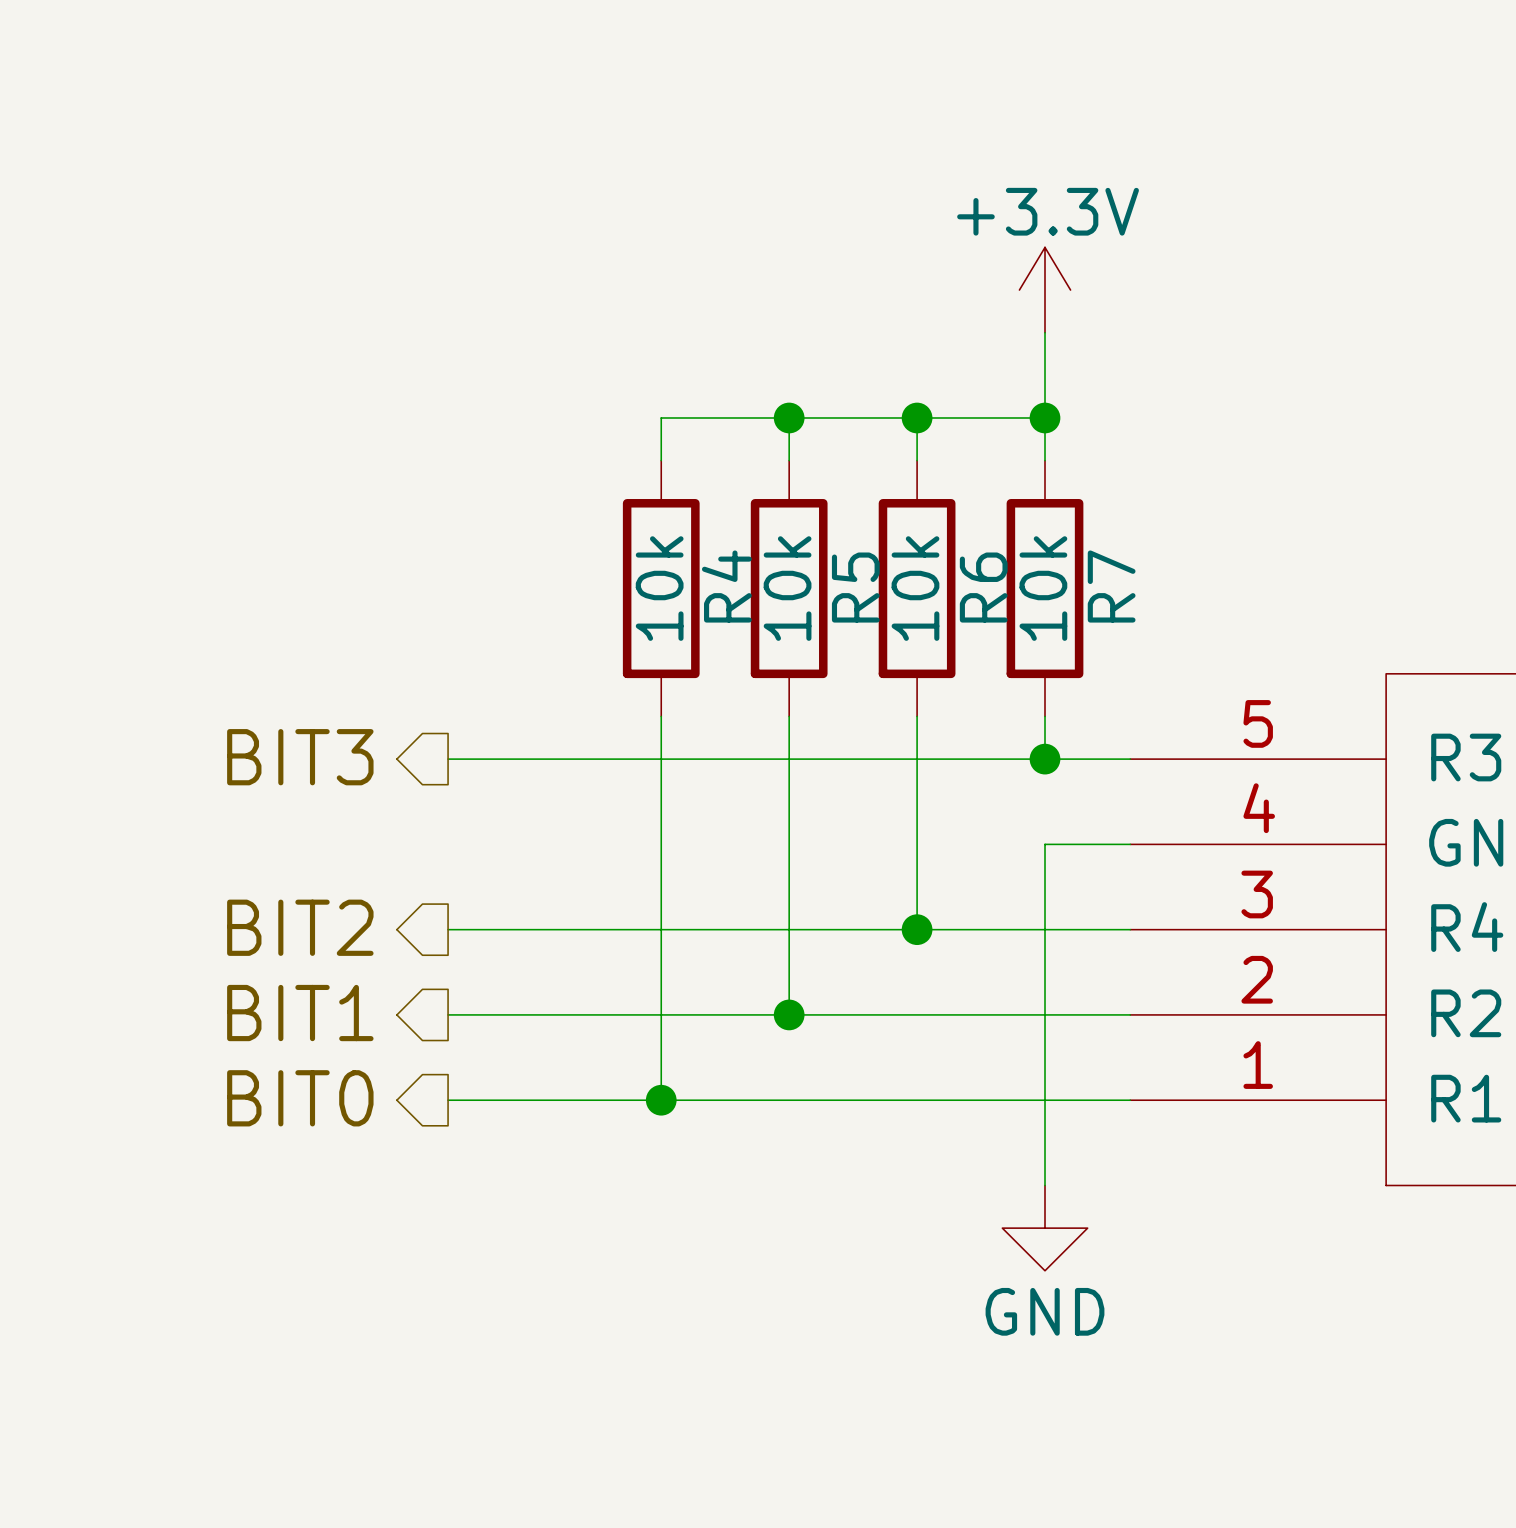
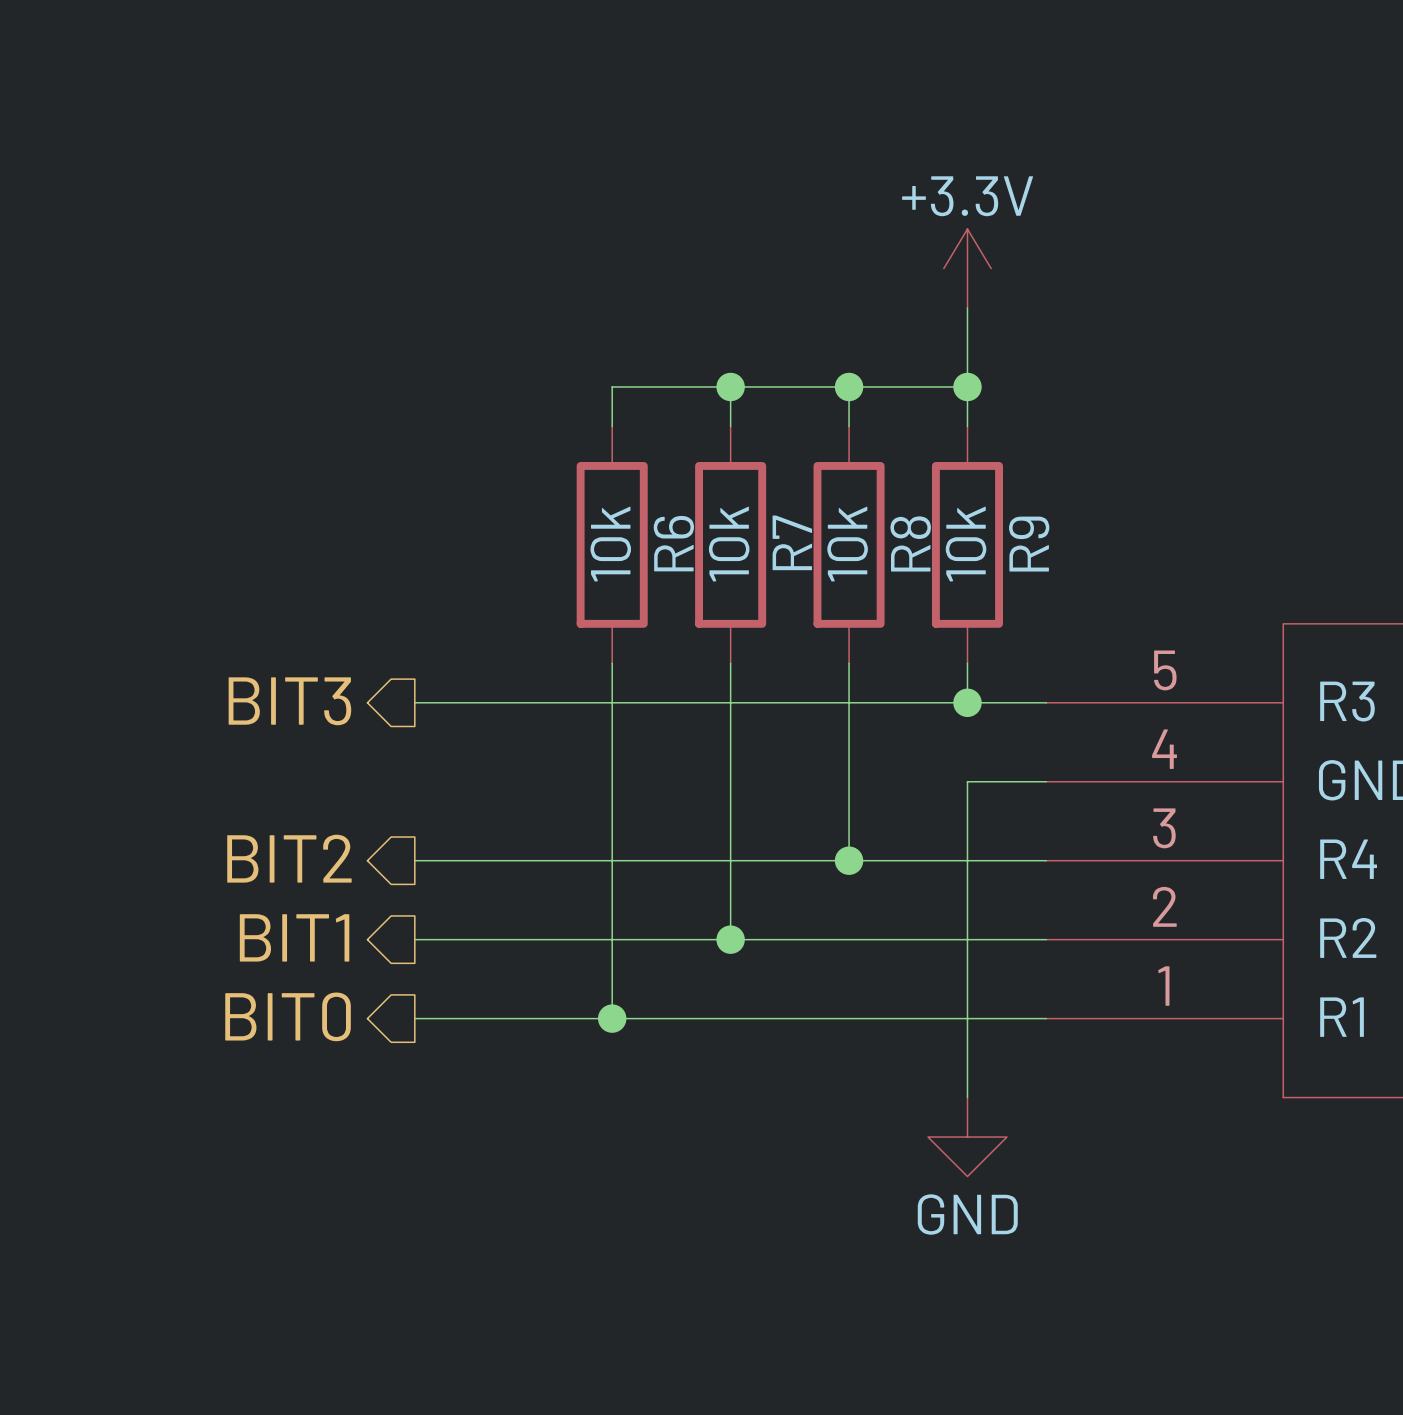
R4 name: R4 (726, 586) -> R6 (673, 543)
R7 name: R7 (1111, 586) -> R9 (1029, 544)
R5 name: R5 (855, 587) -> R7 (792, 542)
R6 name: R6 (983, 587) -> R8 (910, 543)

